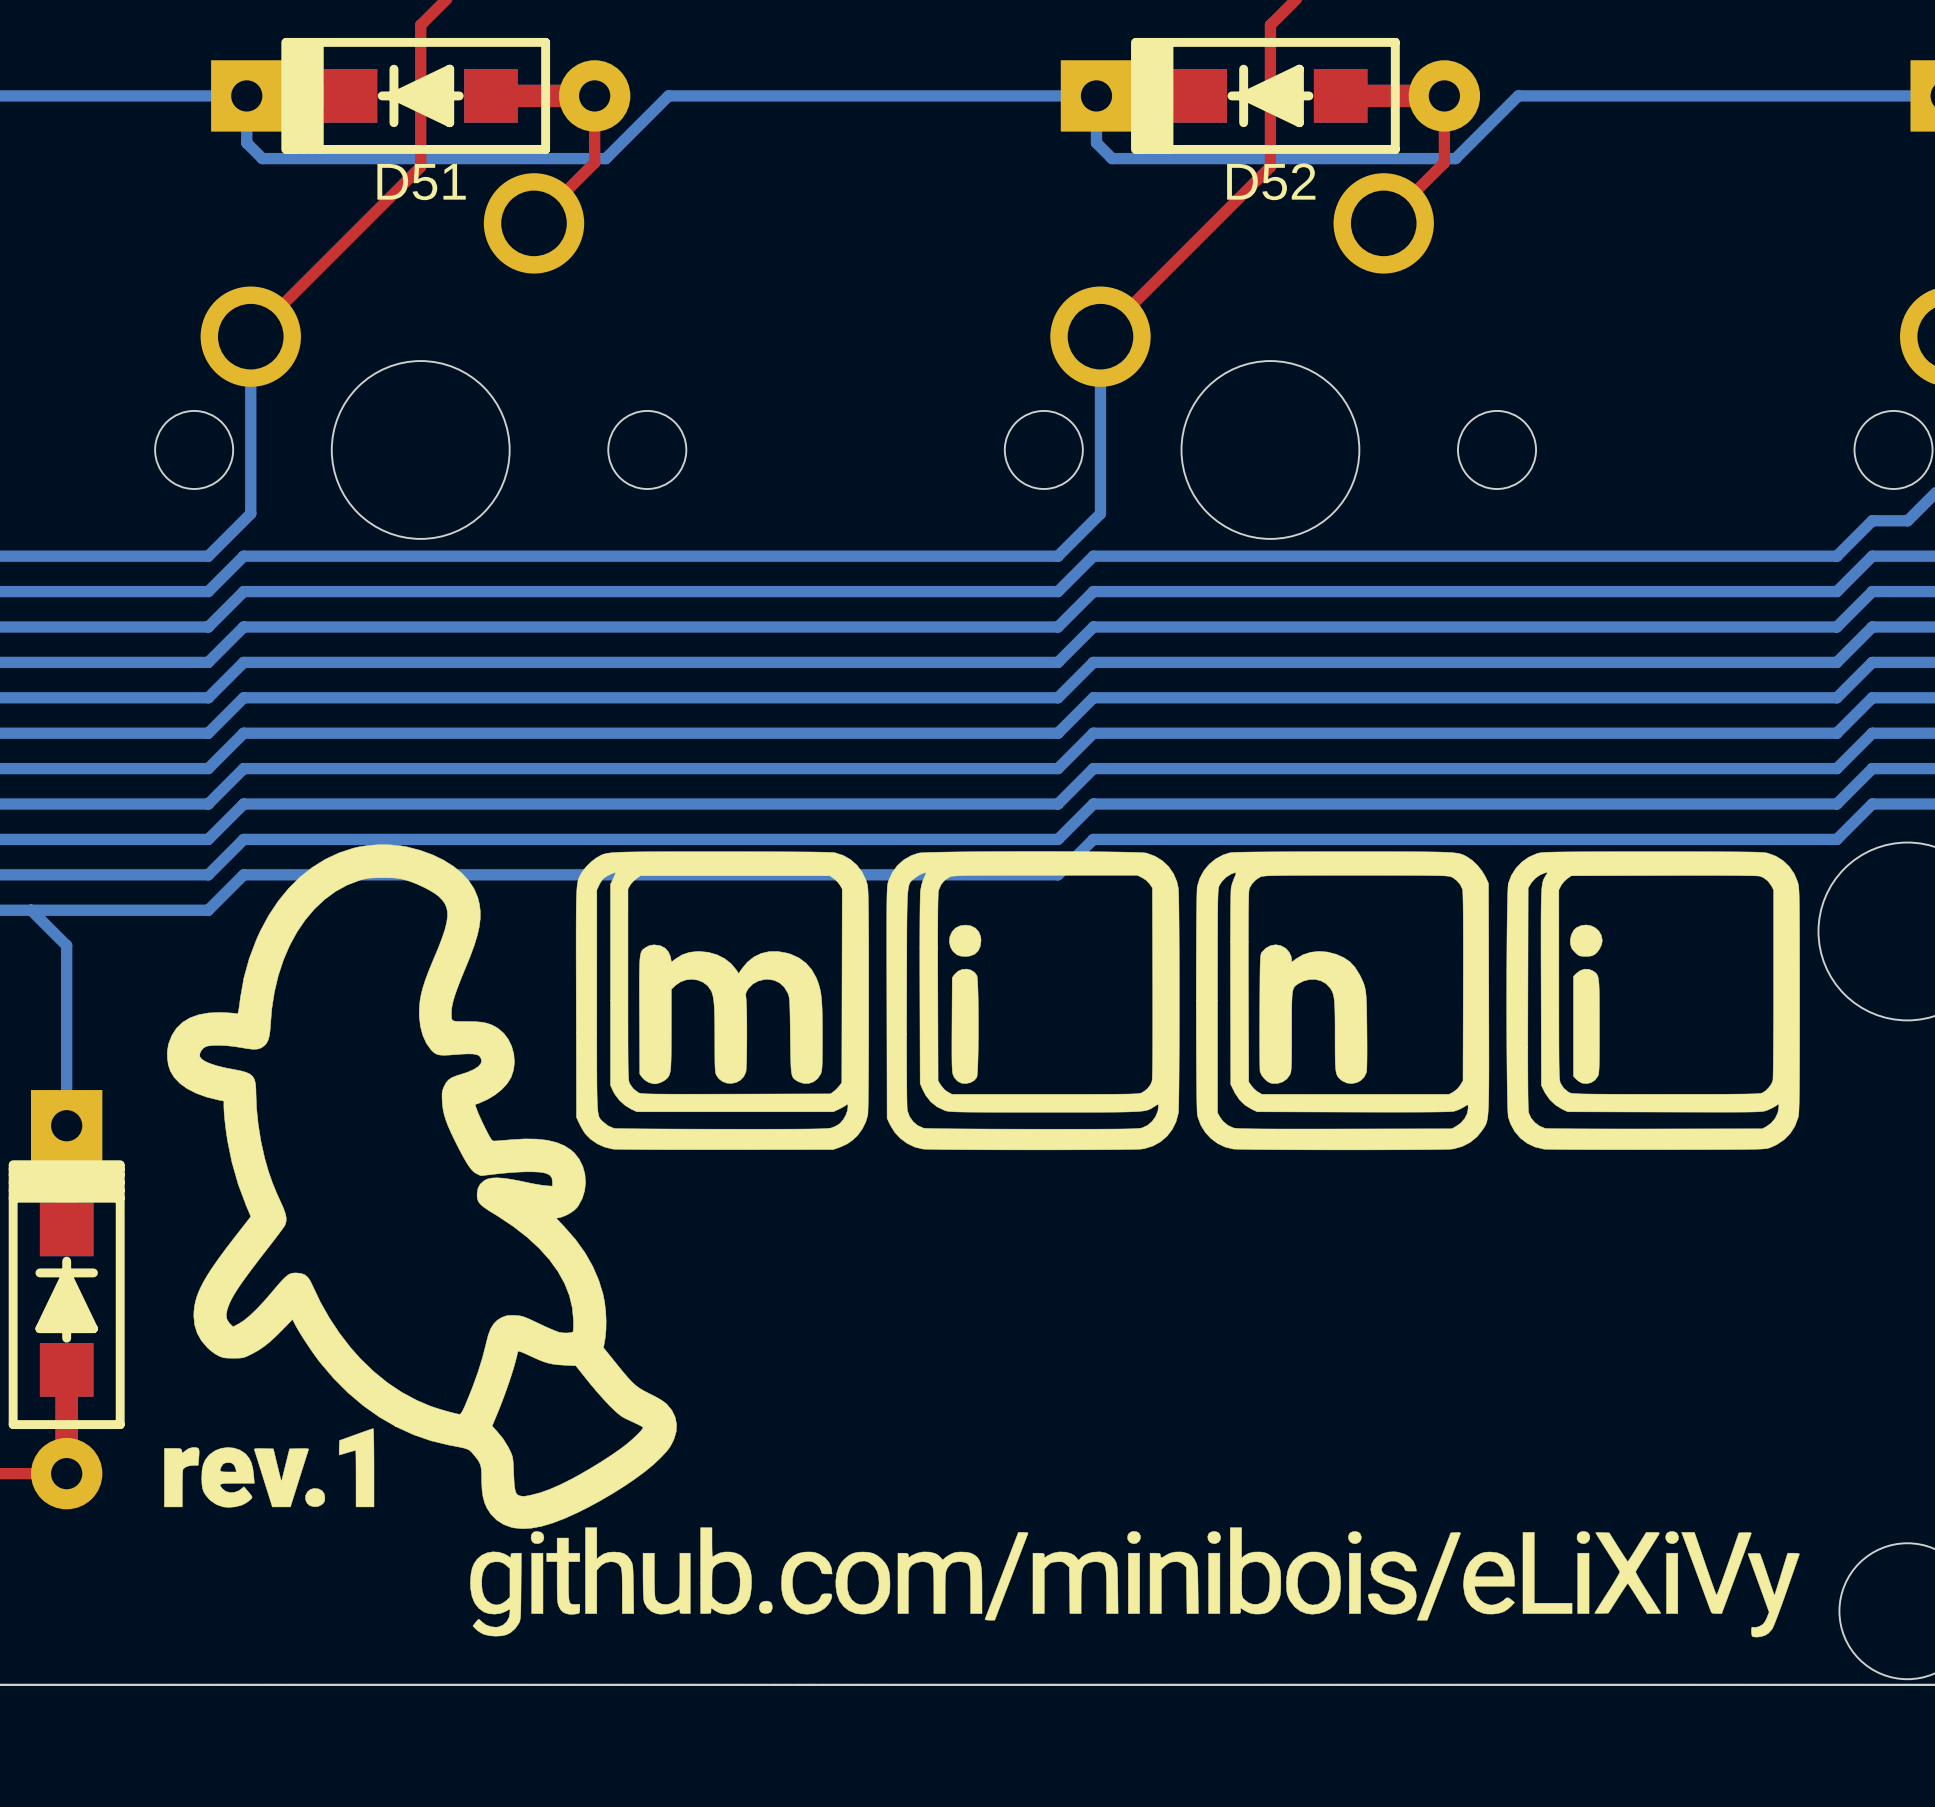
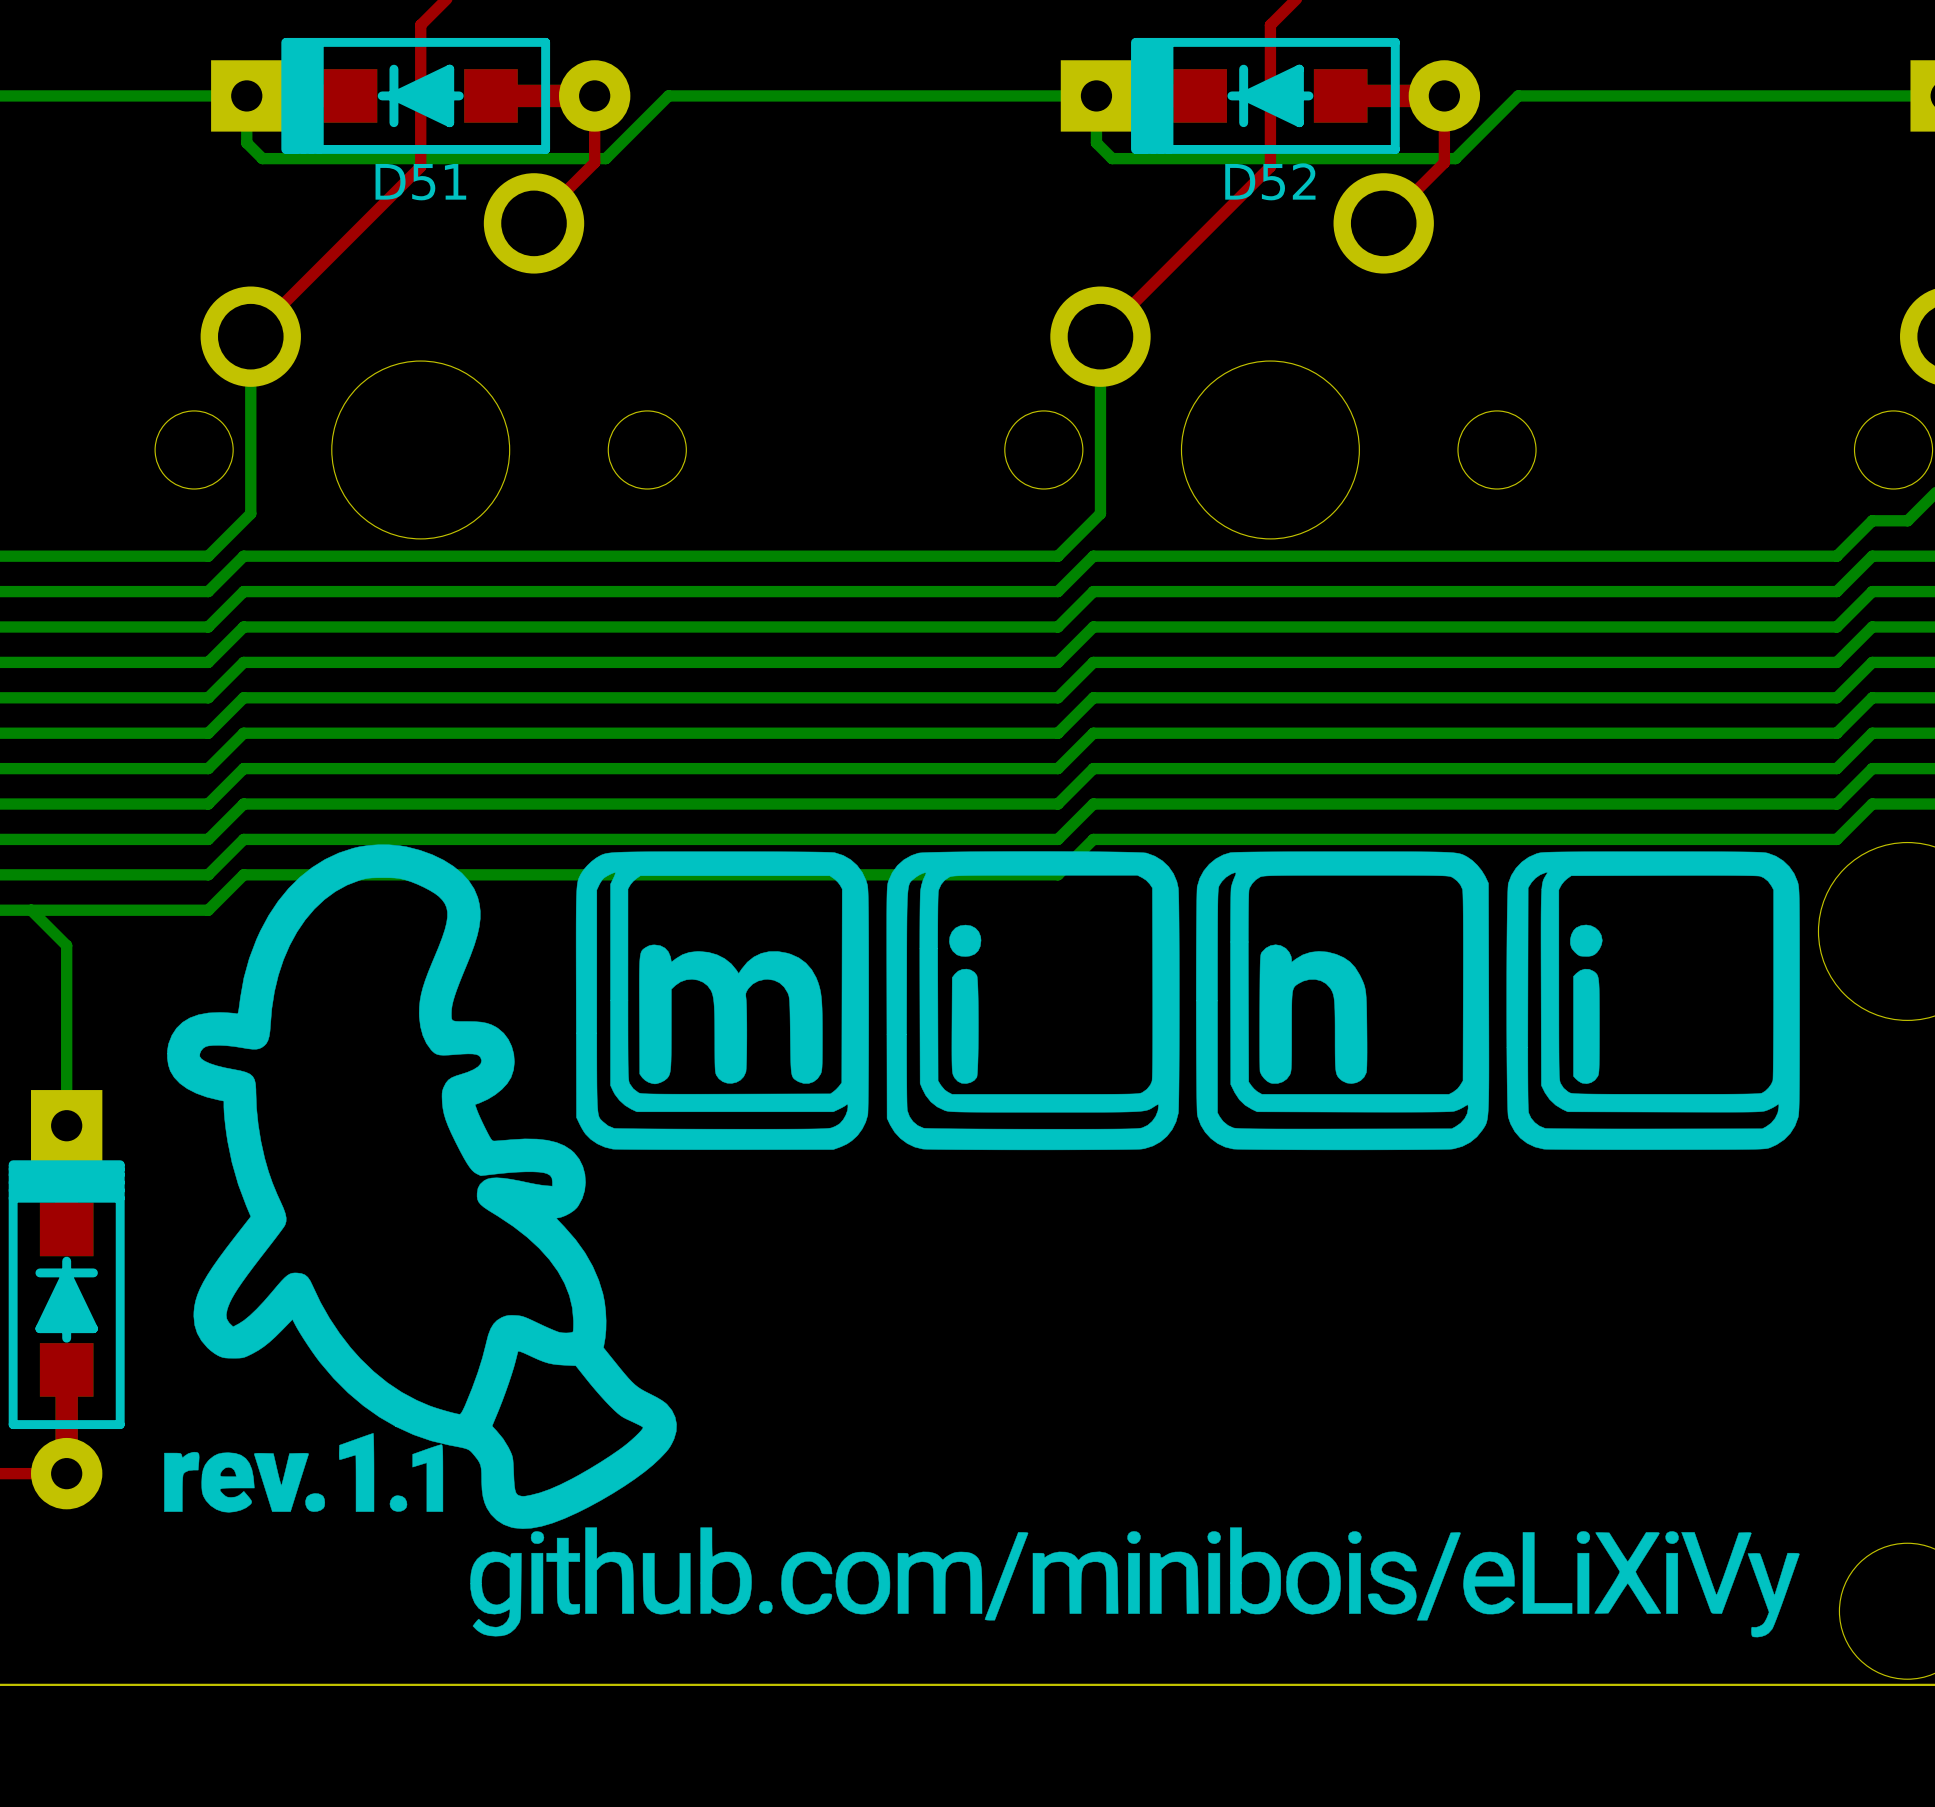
drawing shape: [164, 844, 1800, 1638] -> [164, 844, 1800, 1638]

